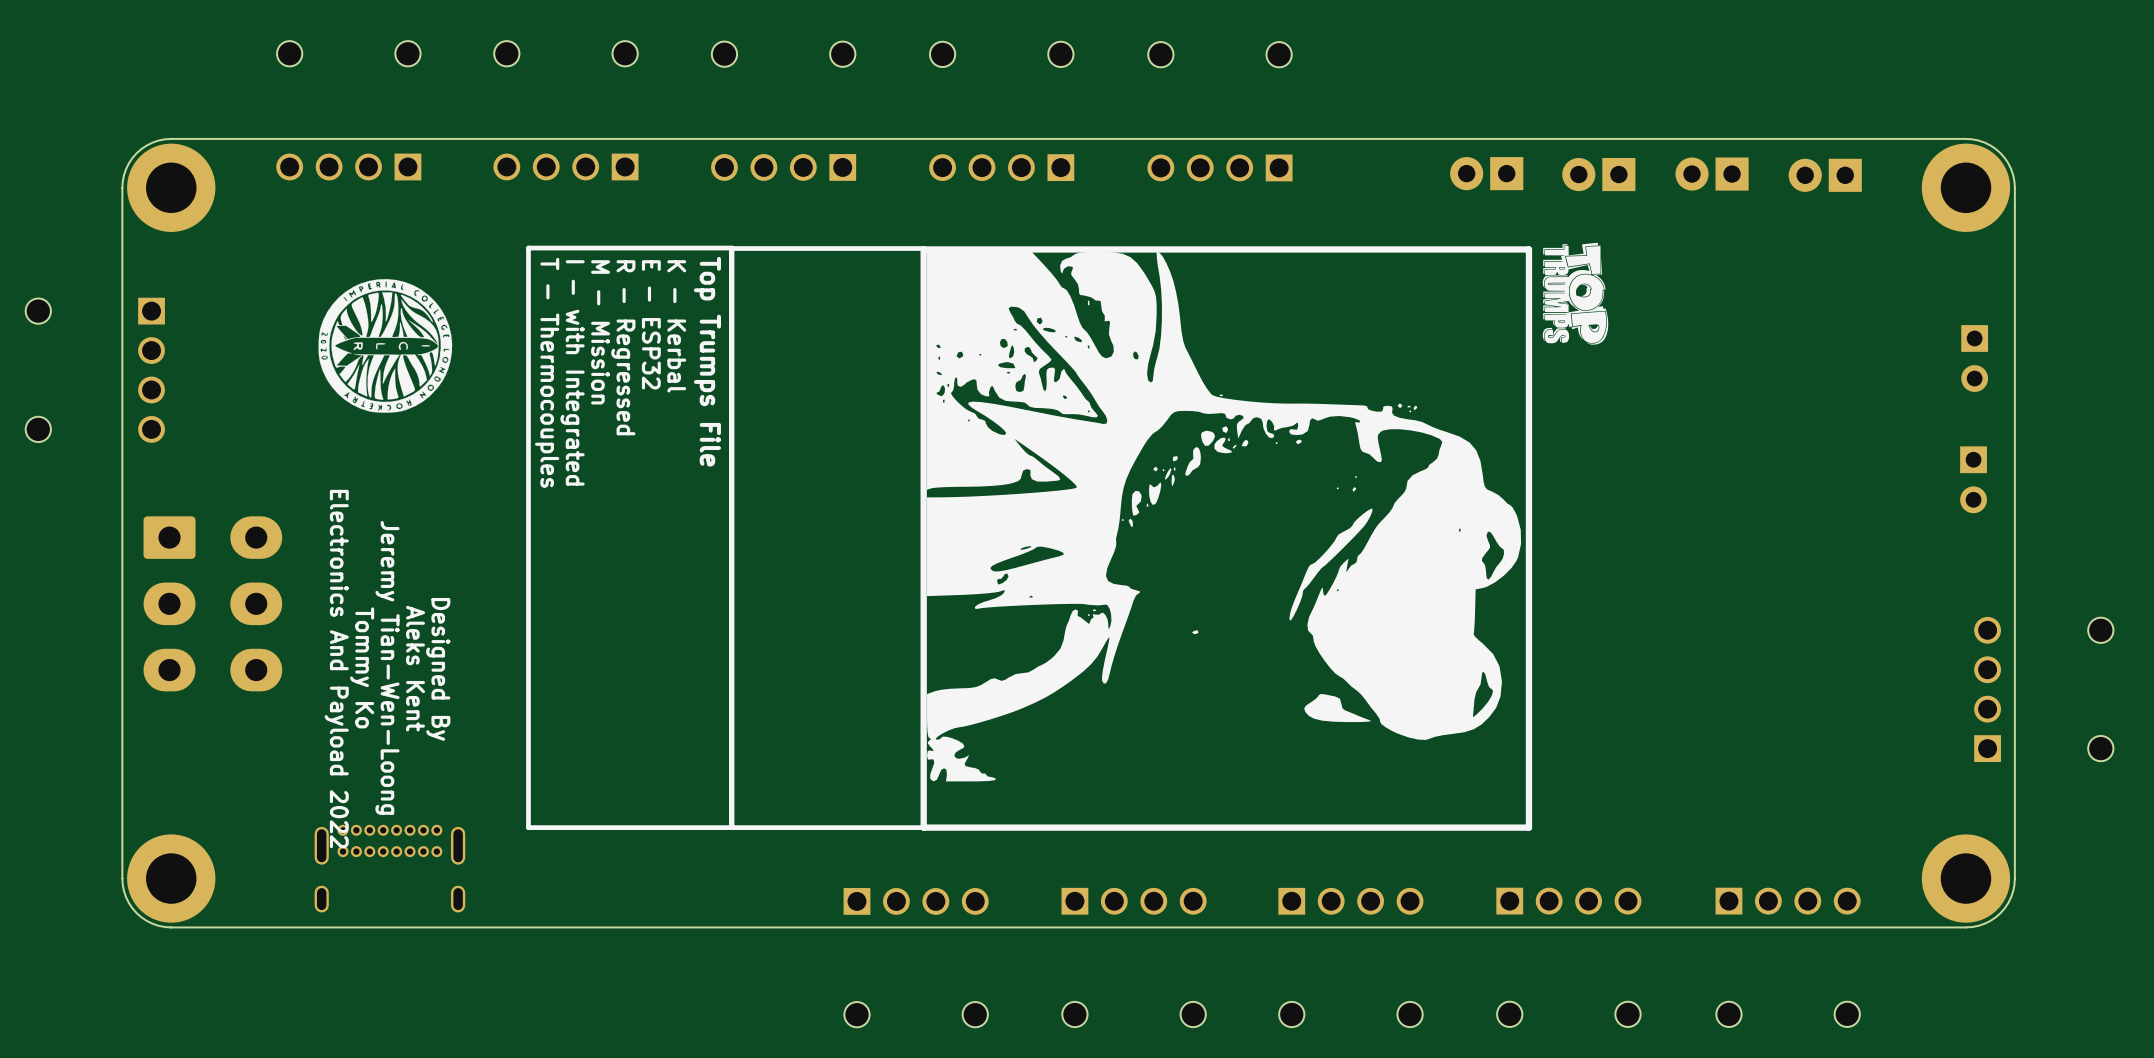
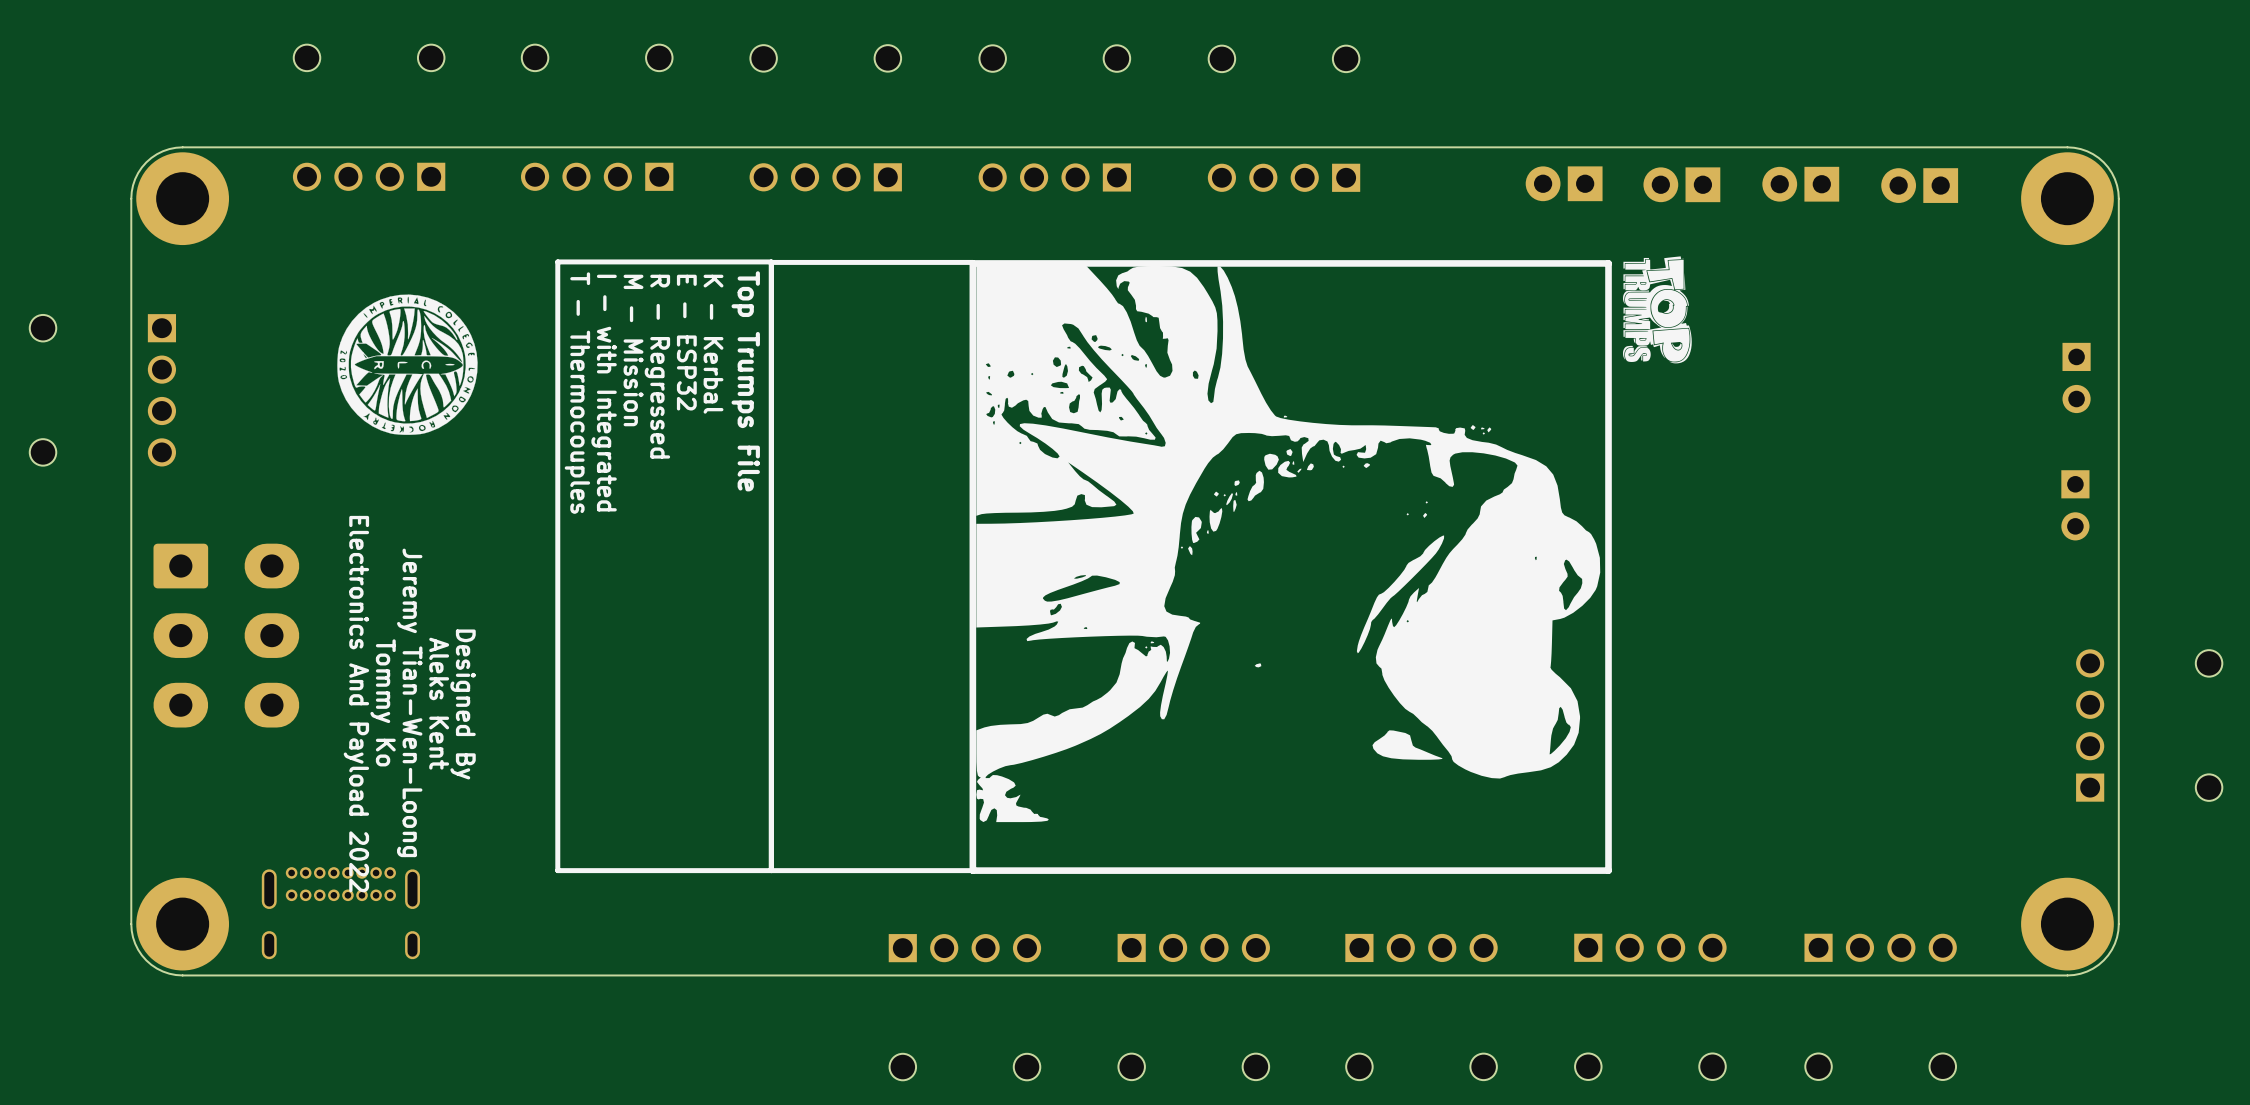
part position: (389, 868) -> (340, 913)

